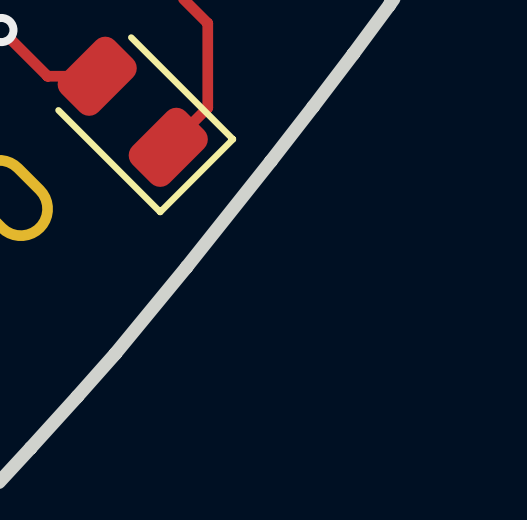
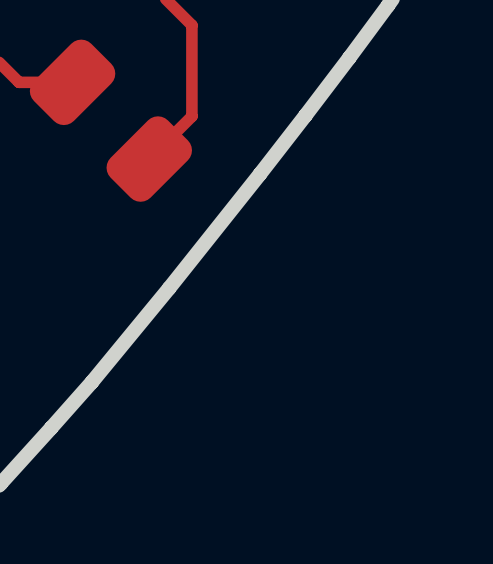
part footprint: [55, 34, 237, 216] -> [29, 39, 193, 202]

